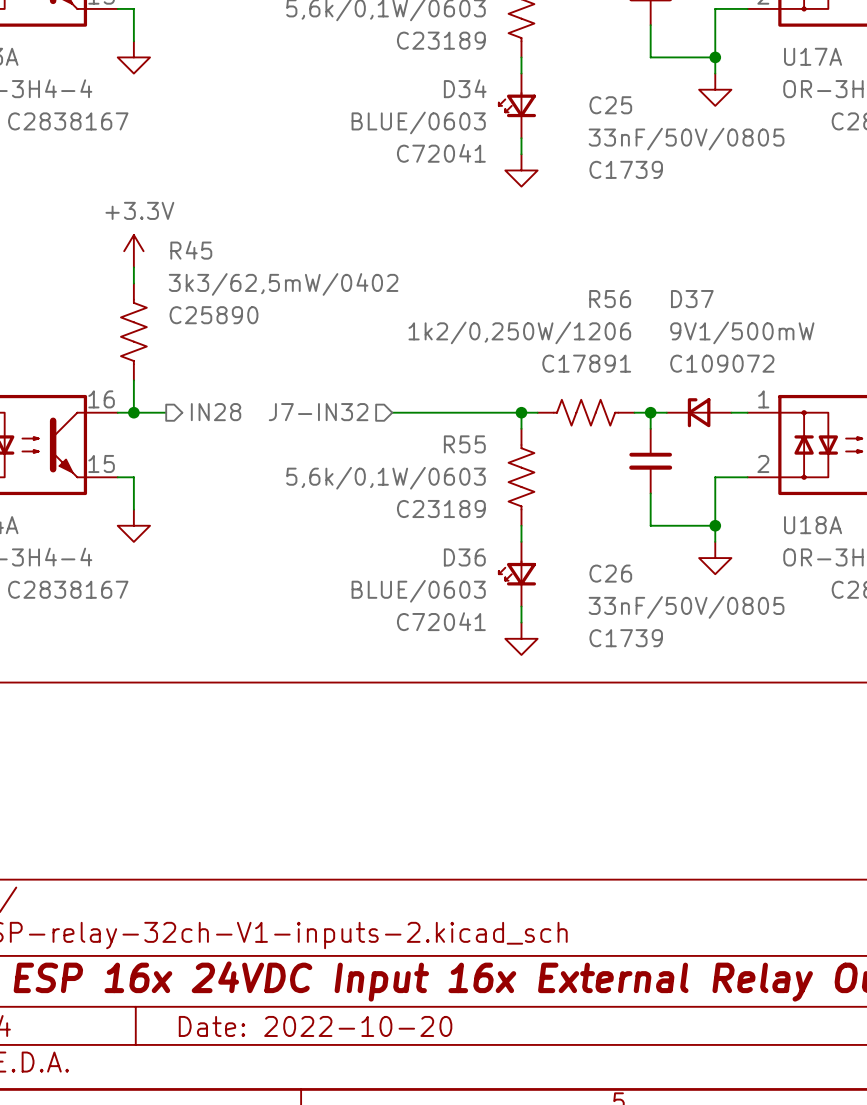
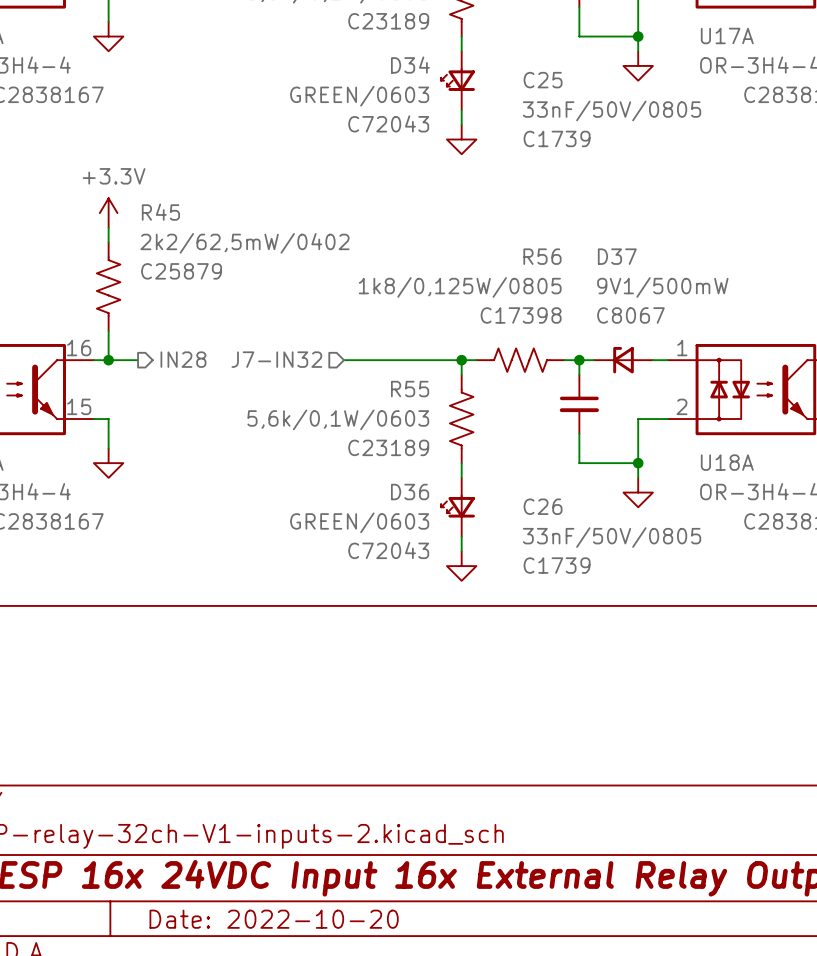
D34 value: BLUE/0603 (418, 122) -> GREEN/0603 (359, 96)
D34 text: C72041 (441, 153) -> C72043 (388, 123)
R45 value: 3k3/62,5mW/0402 (283, 284) -> 2k2/62,5mW/0402 (244, 243)
R45 text: C25890 (213, 315) -> C25879 (181, 271)
R56 value: 1k2/0,250W/1206 (519, 332) -> 1k8/0,125W/0805 (460, 287)
R56 text: C17891 (586, 363) -> C17398 (521, 315)
D37 text: C109072 (722, 363) -> C8067 (630, 315)
D36 value: BLUE/0603 (418, 591) -> GREEN/0603 (359, 522)
D36 text: C72041 (441, 621) -> C72043 (388, 550)

